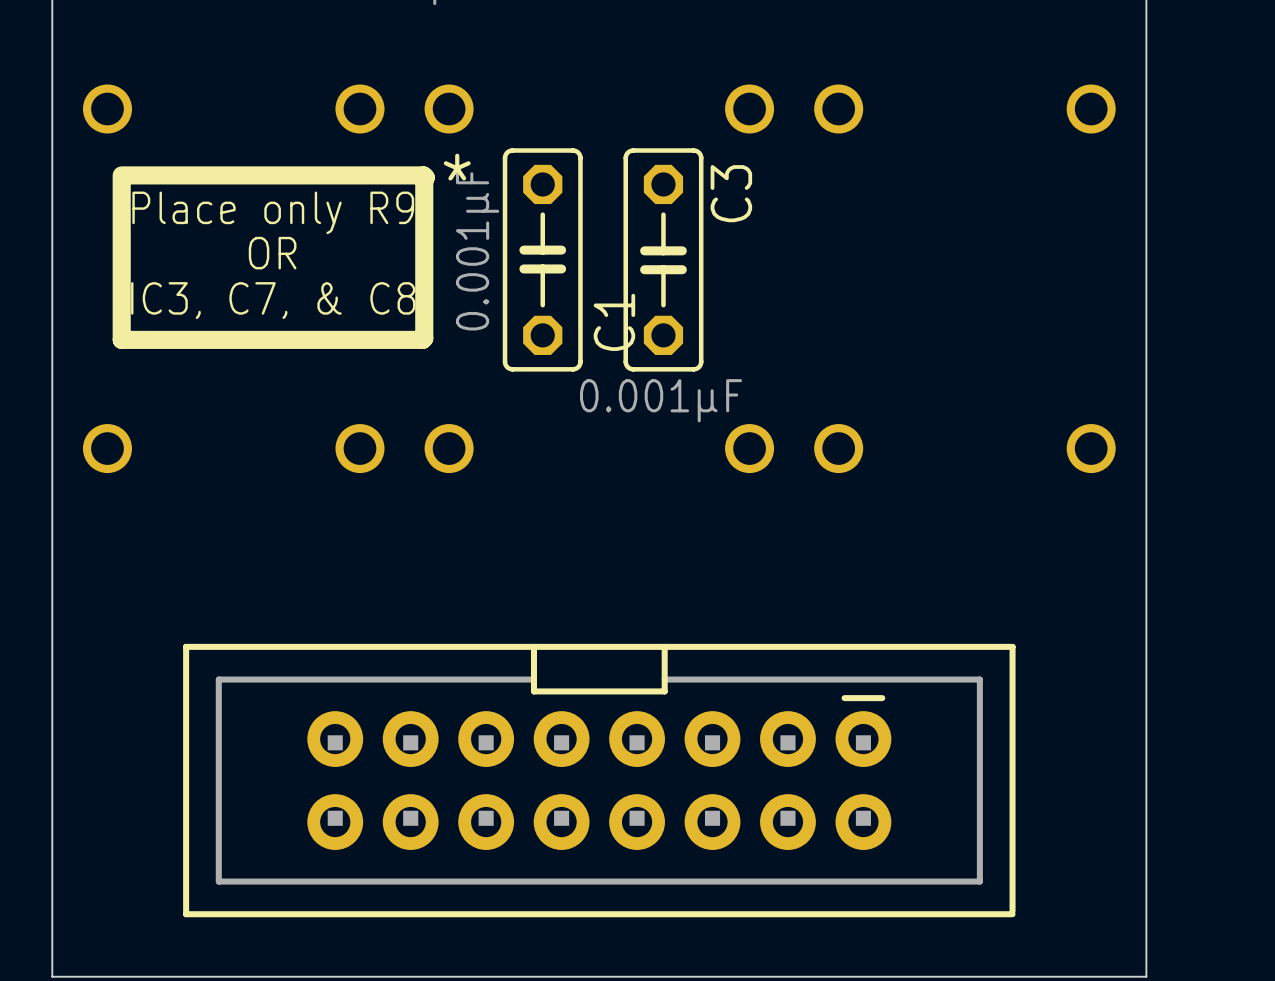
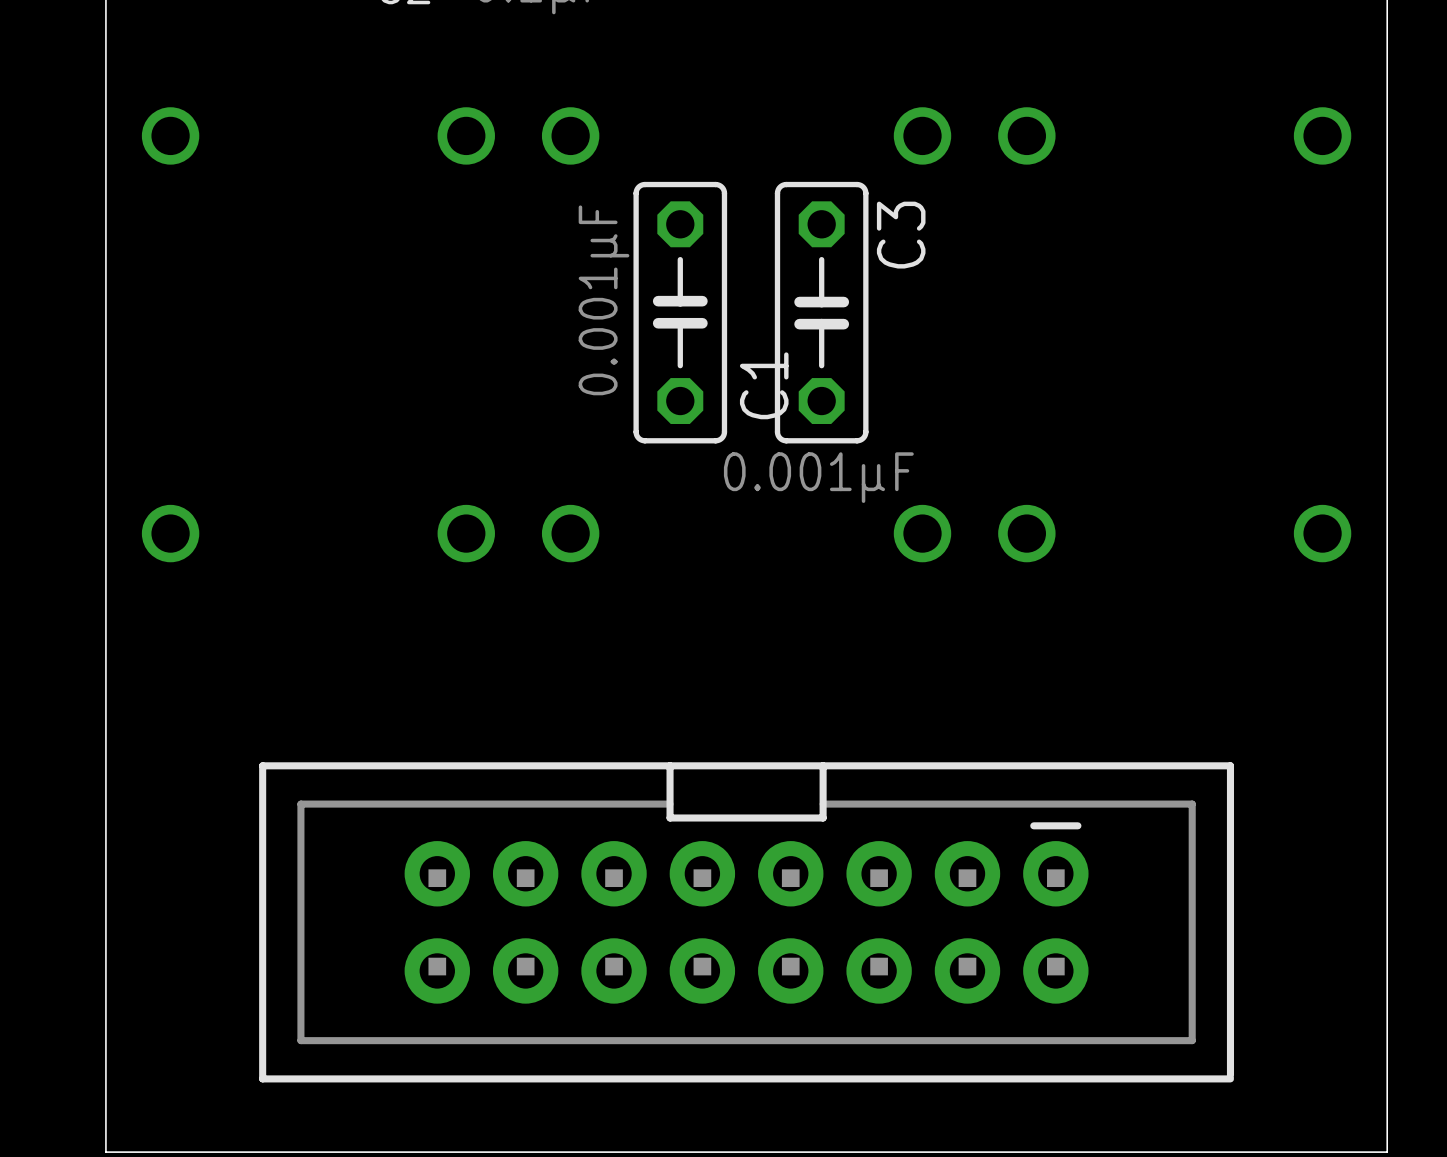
text: * (457, 167) -> none
line: (121, 175) (423, 175) (425, 177) (424, 338) (422, 339) (121, 339) (121, 177) -> none
text: Place only R9 (273, 212) -> none
text: OR (272, 253) -> none
text: IC3, C7, & C8 (273, 300) -> none

